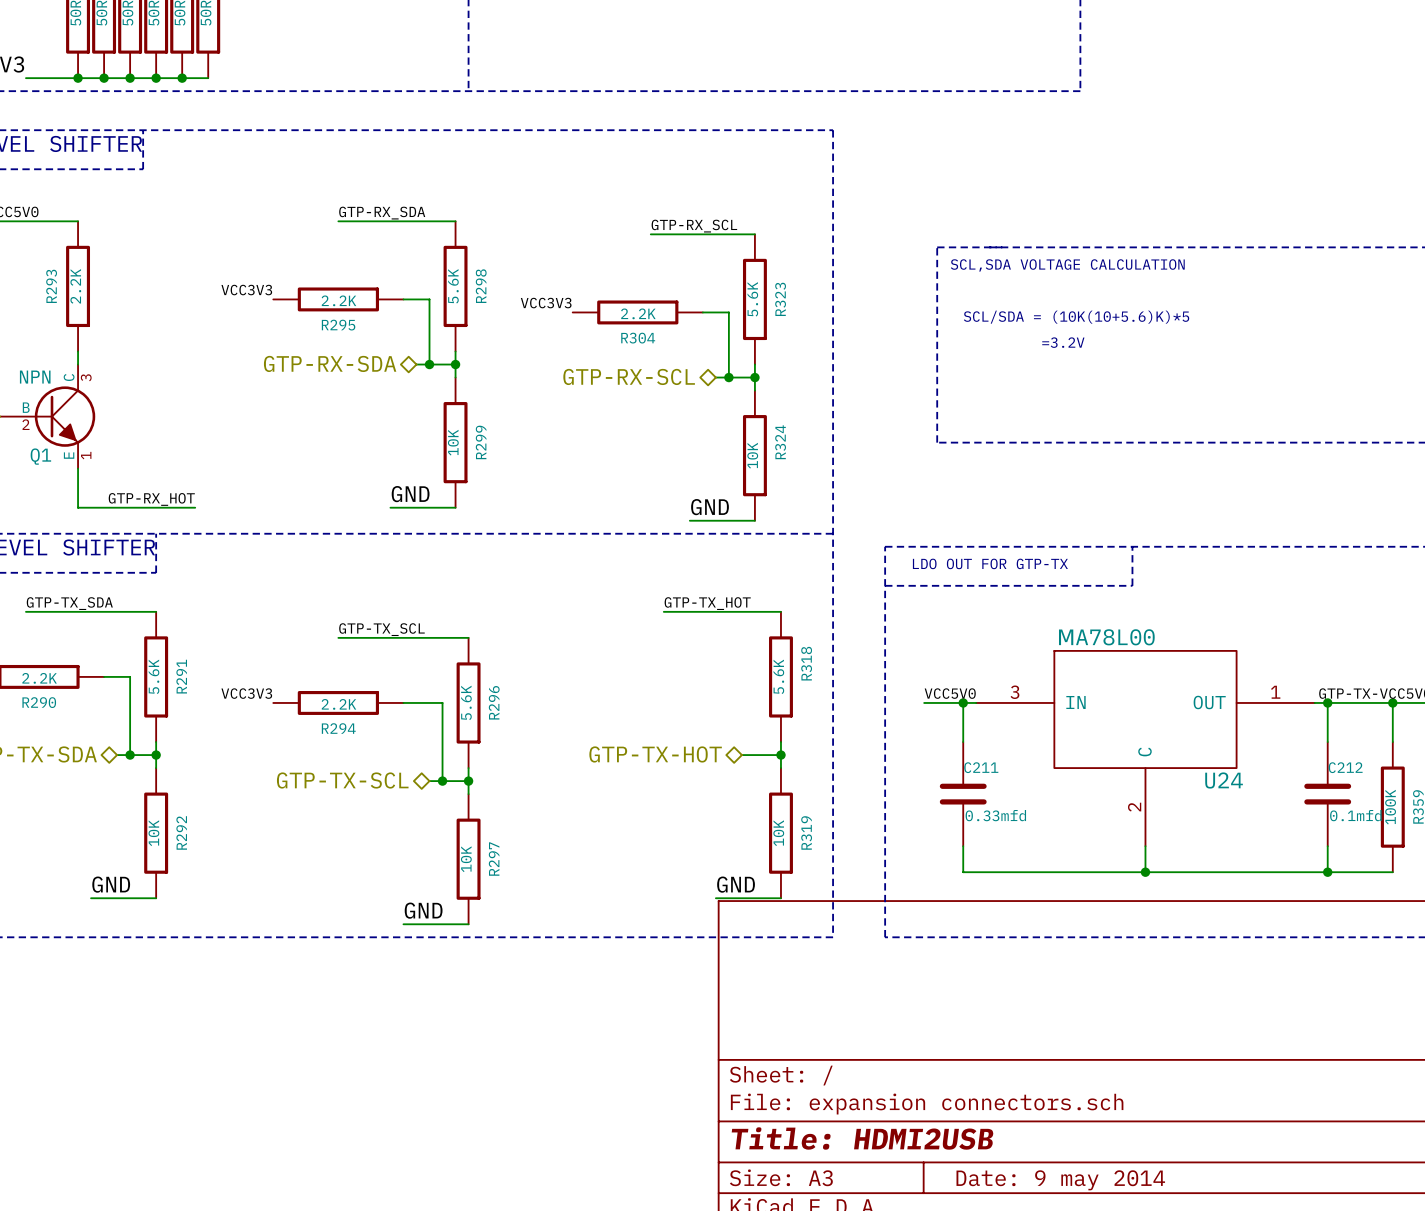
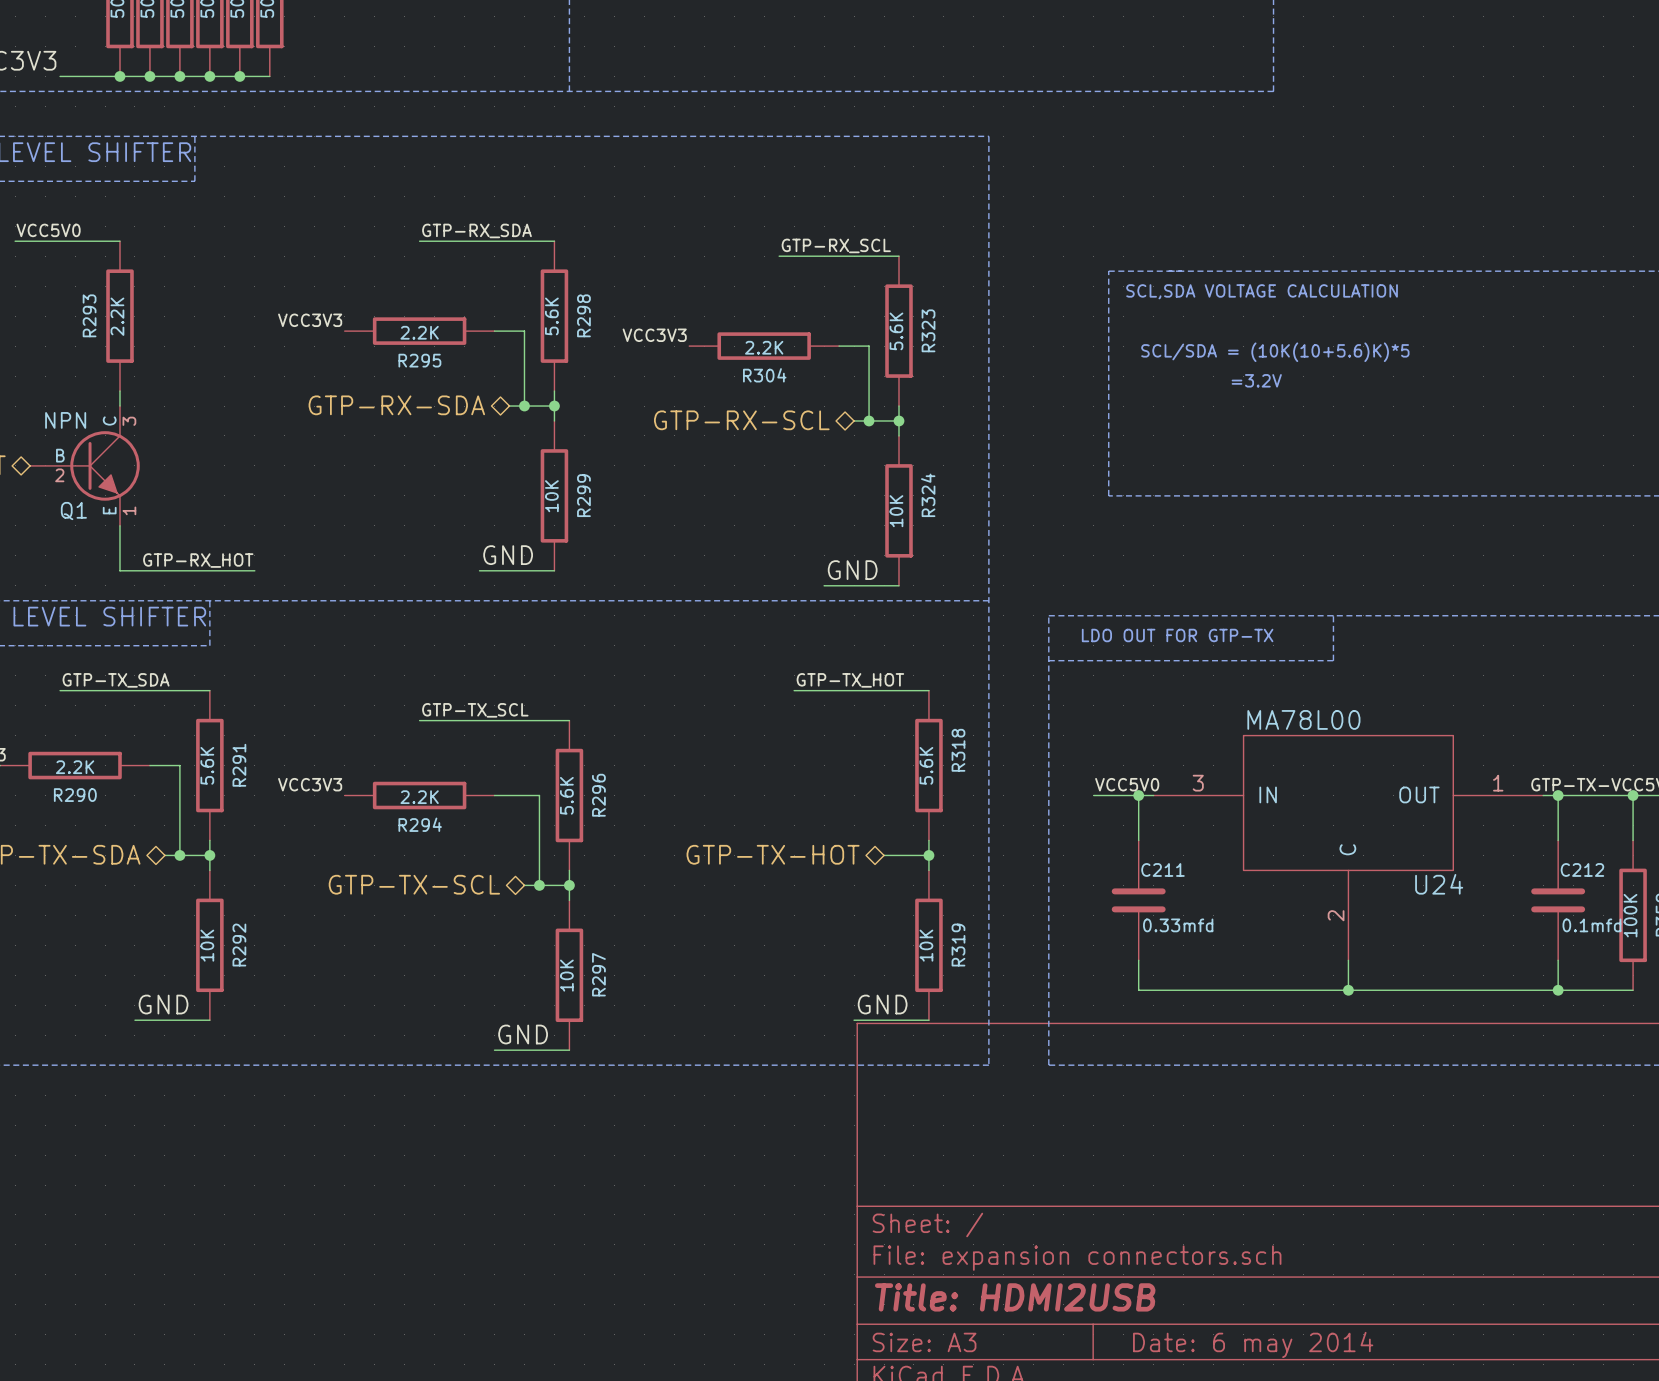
title block: Date: 9 may 2014 (1060, 1180) -> Date: 6 may 2014 (1253, 1344)

